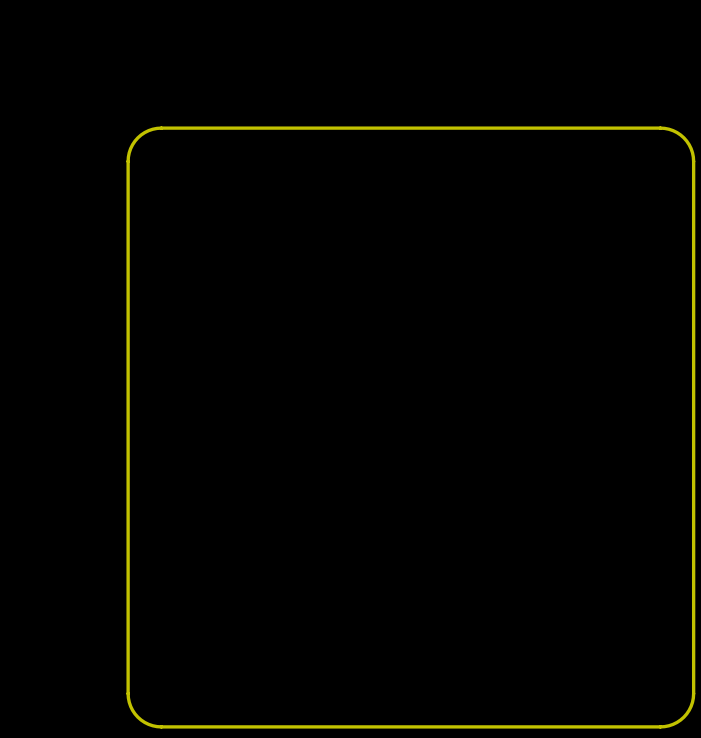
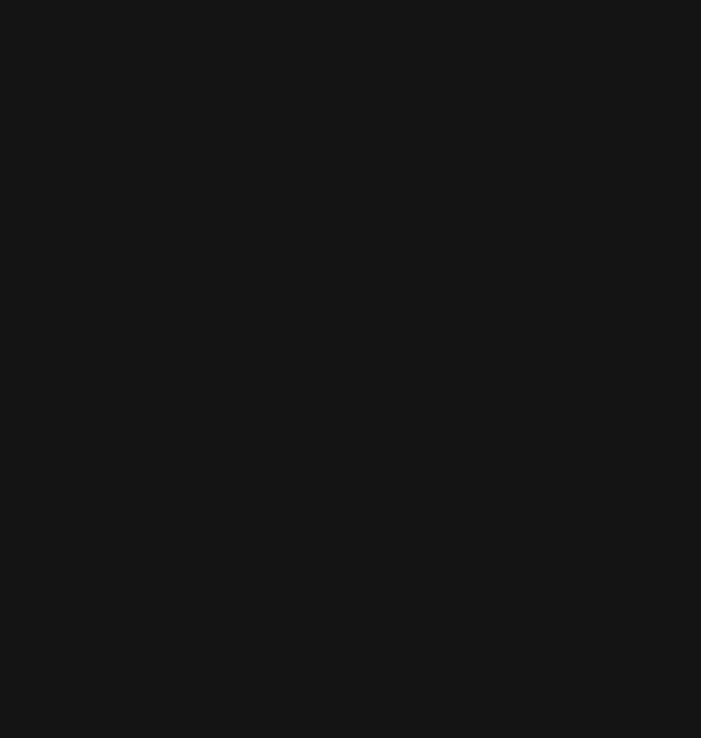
board edge: (161, 128) (660, 128) (673, 130) (683, 137) (691, 148) (693, 161) (693, 693) (691, 706) (683, 717) (673, 724) (660, 726) (161, 726) (148, 724) (137, 717) (130, 706) (128, 693) (128, 161) (130, 148) (137, 137) (148, 130) (161, 128) -> none

